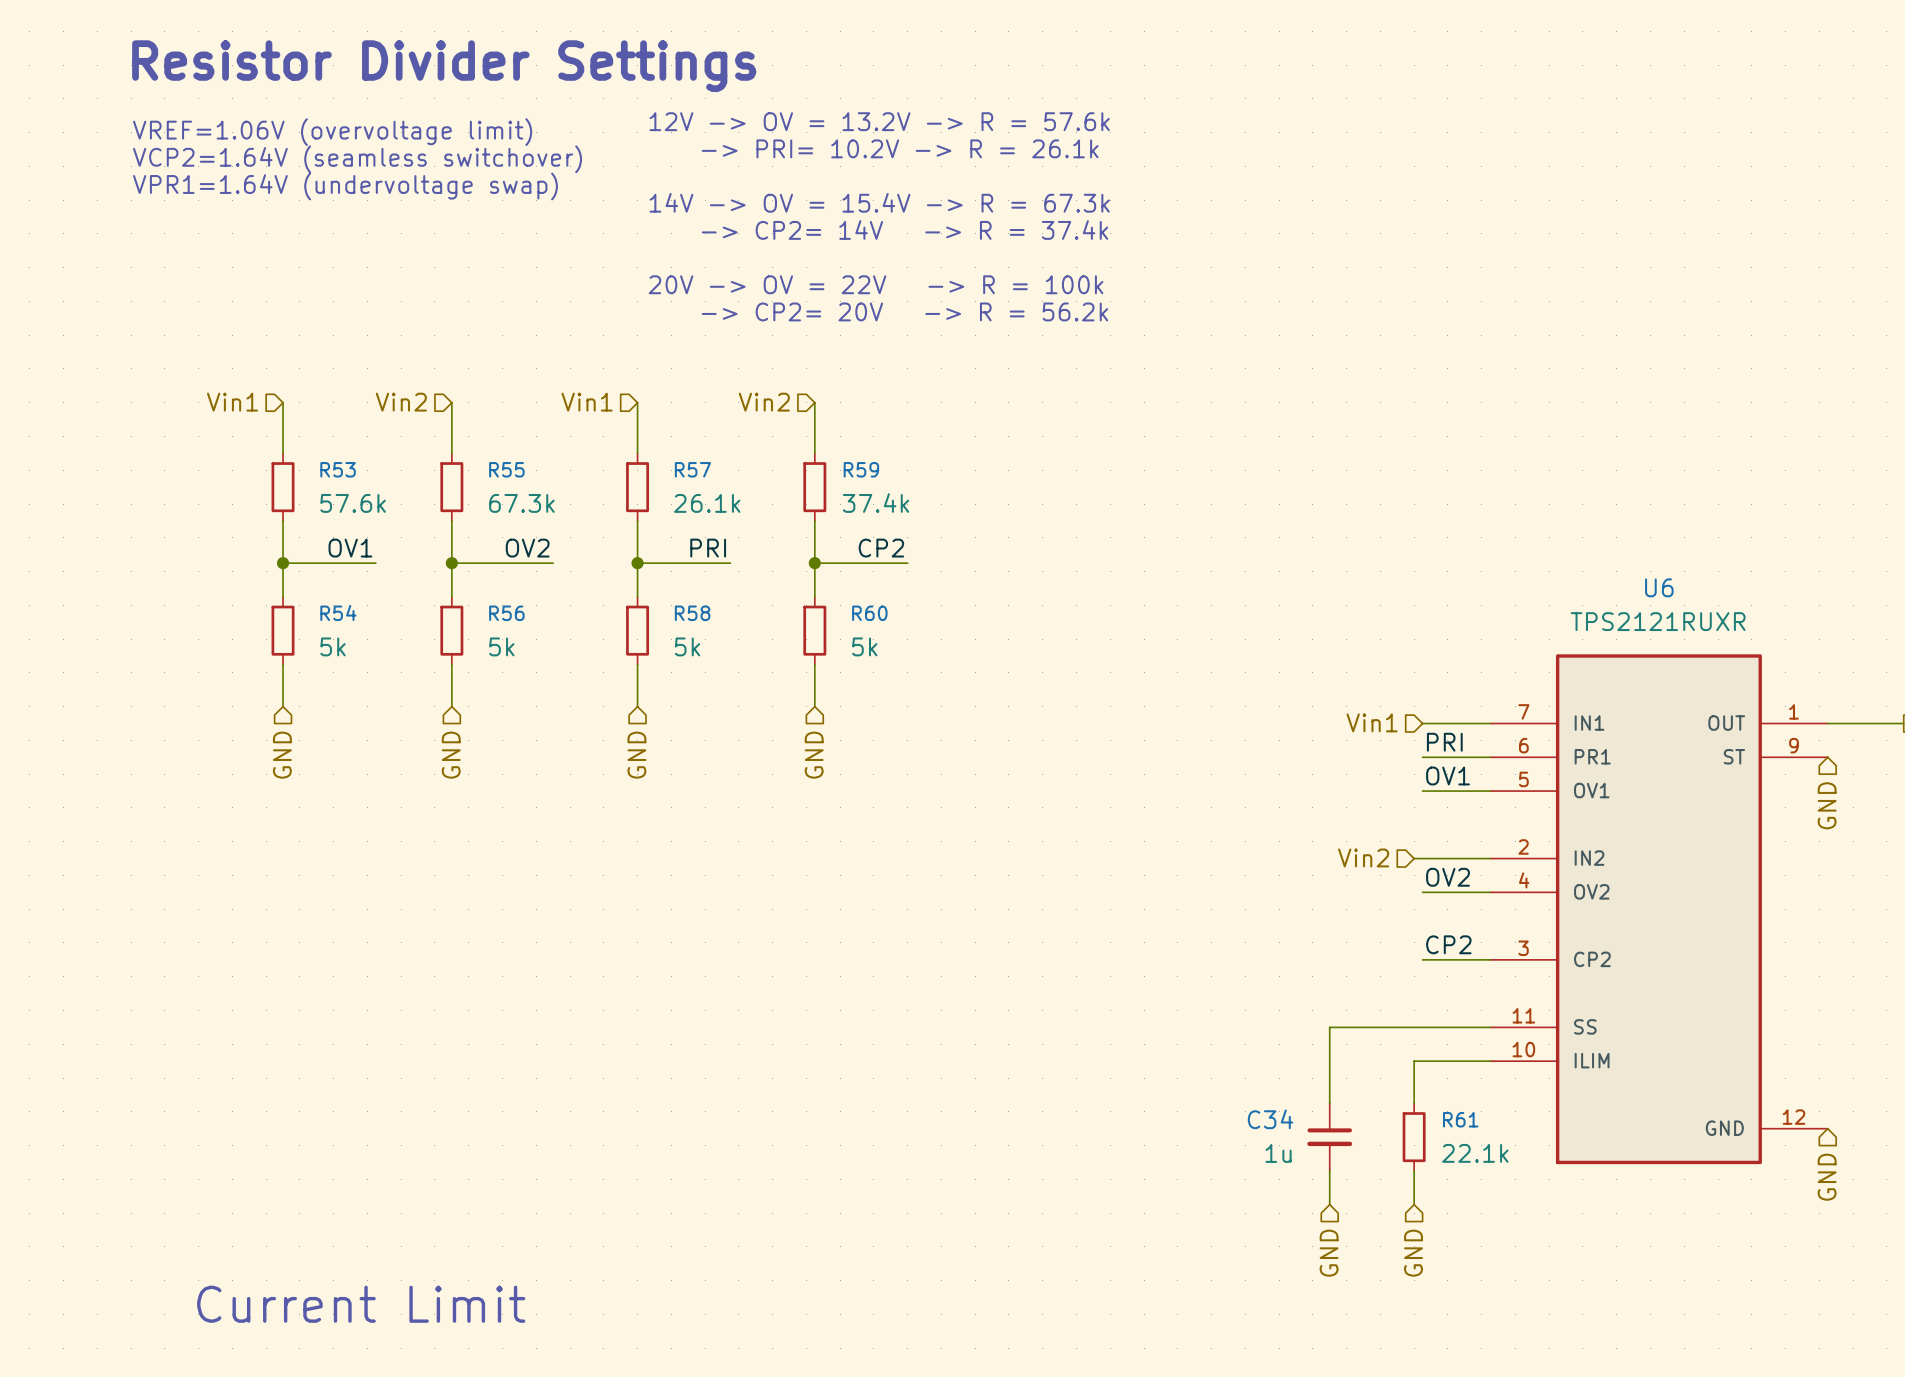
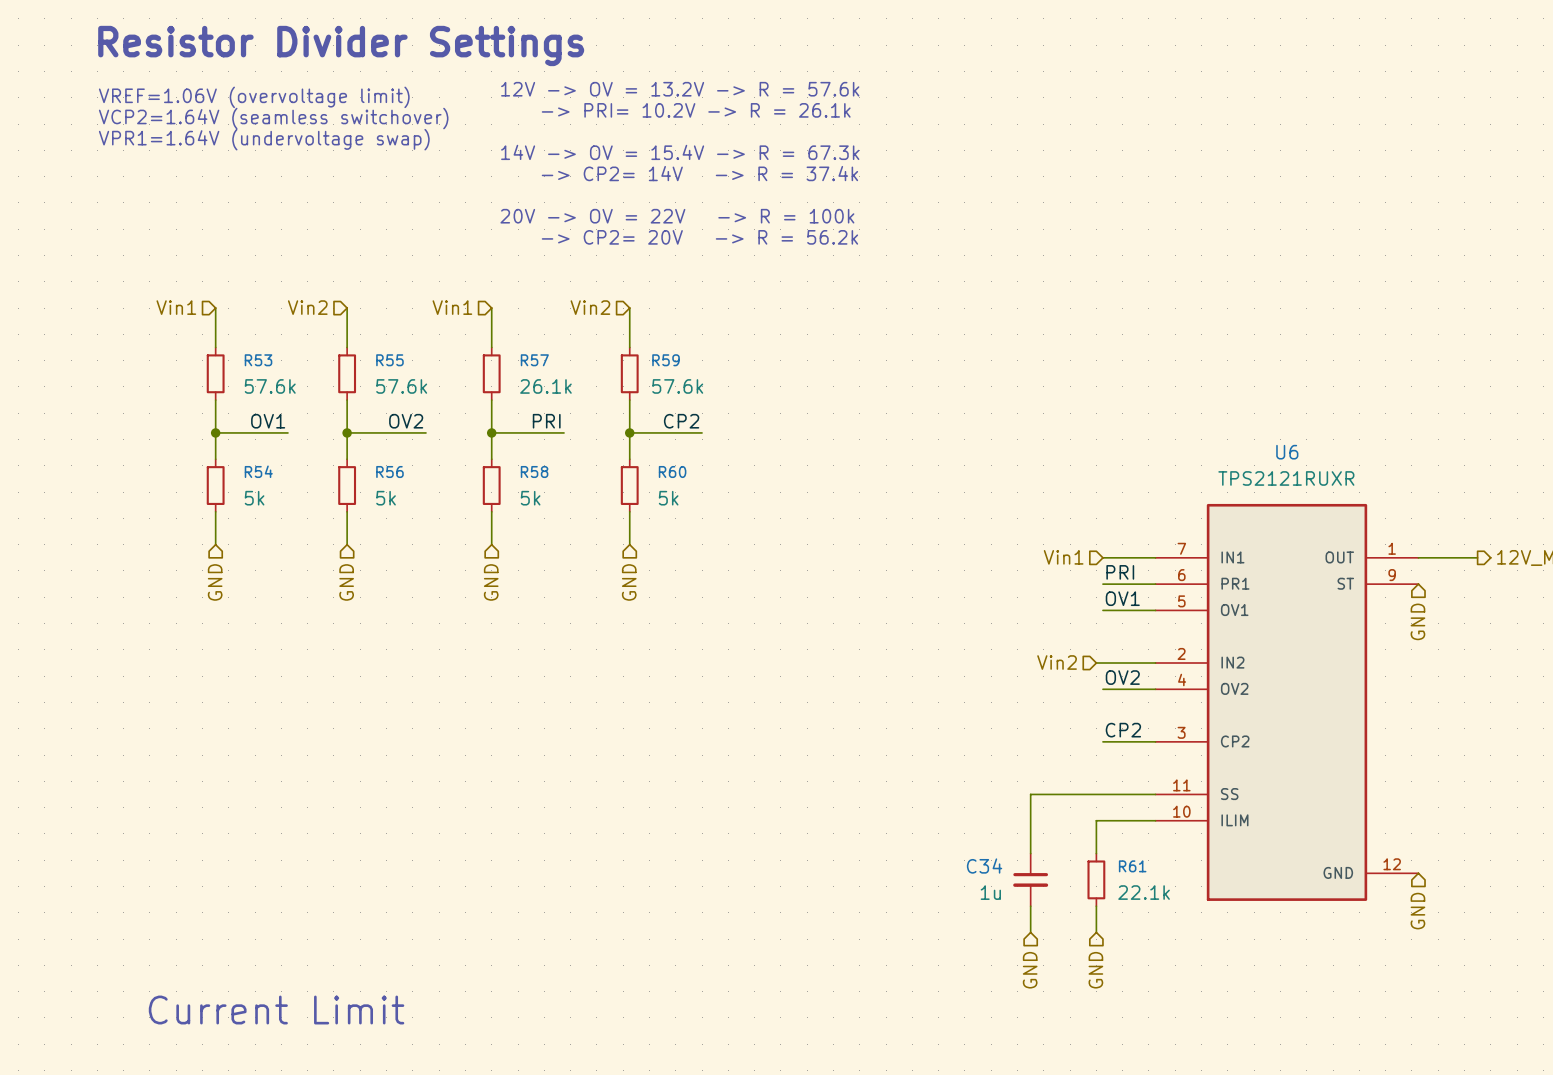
R55 value: 67.3k (521, 503) -> 57.6k (401, 386)
R59 value: 37.4k (876, 503) -> 57.6k (677, 386)

